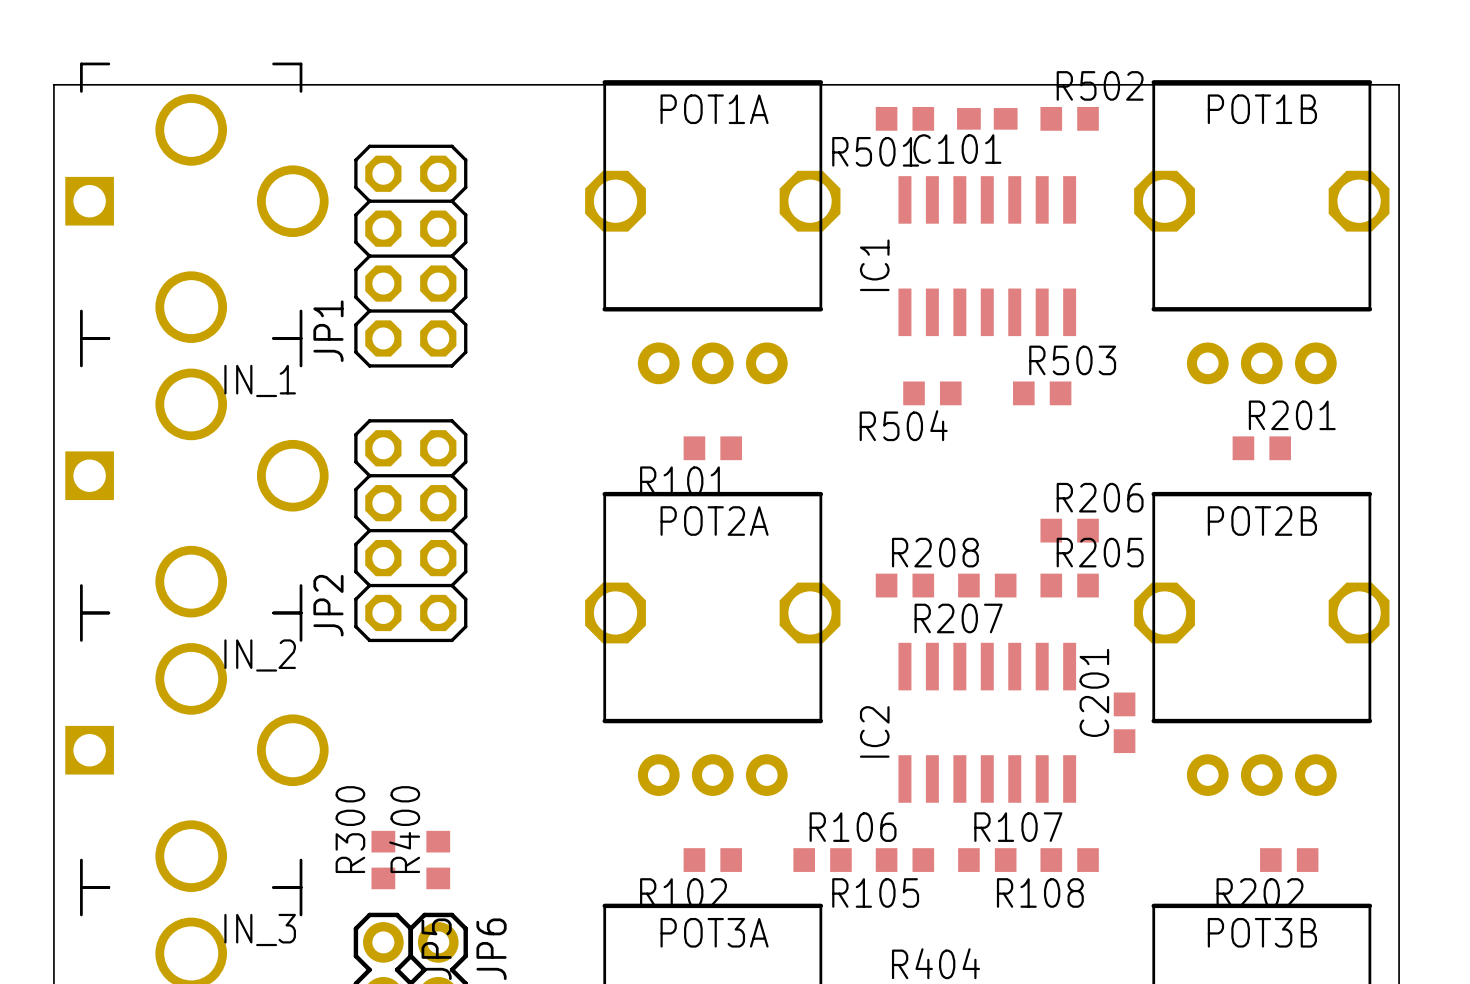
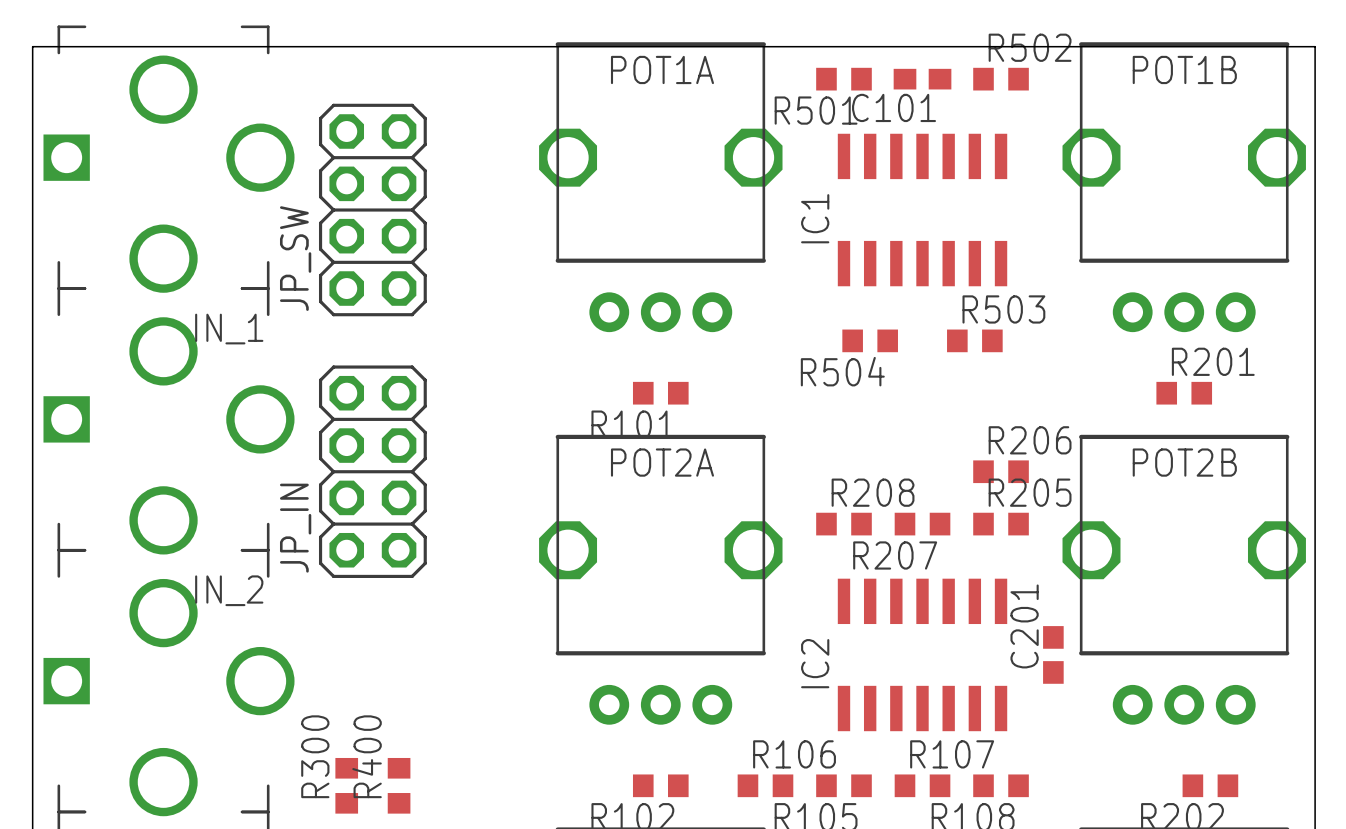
JP1 name: JP1 (328, 331) -> JP_SW (295, 258)
JP2 name: JP2 (328, 605) -> JP_IN (295, 528)

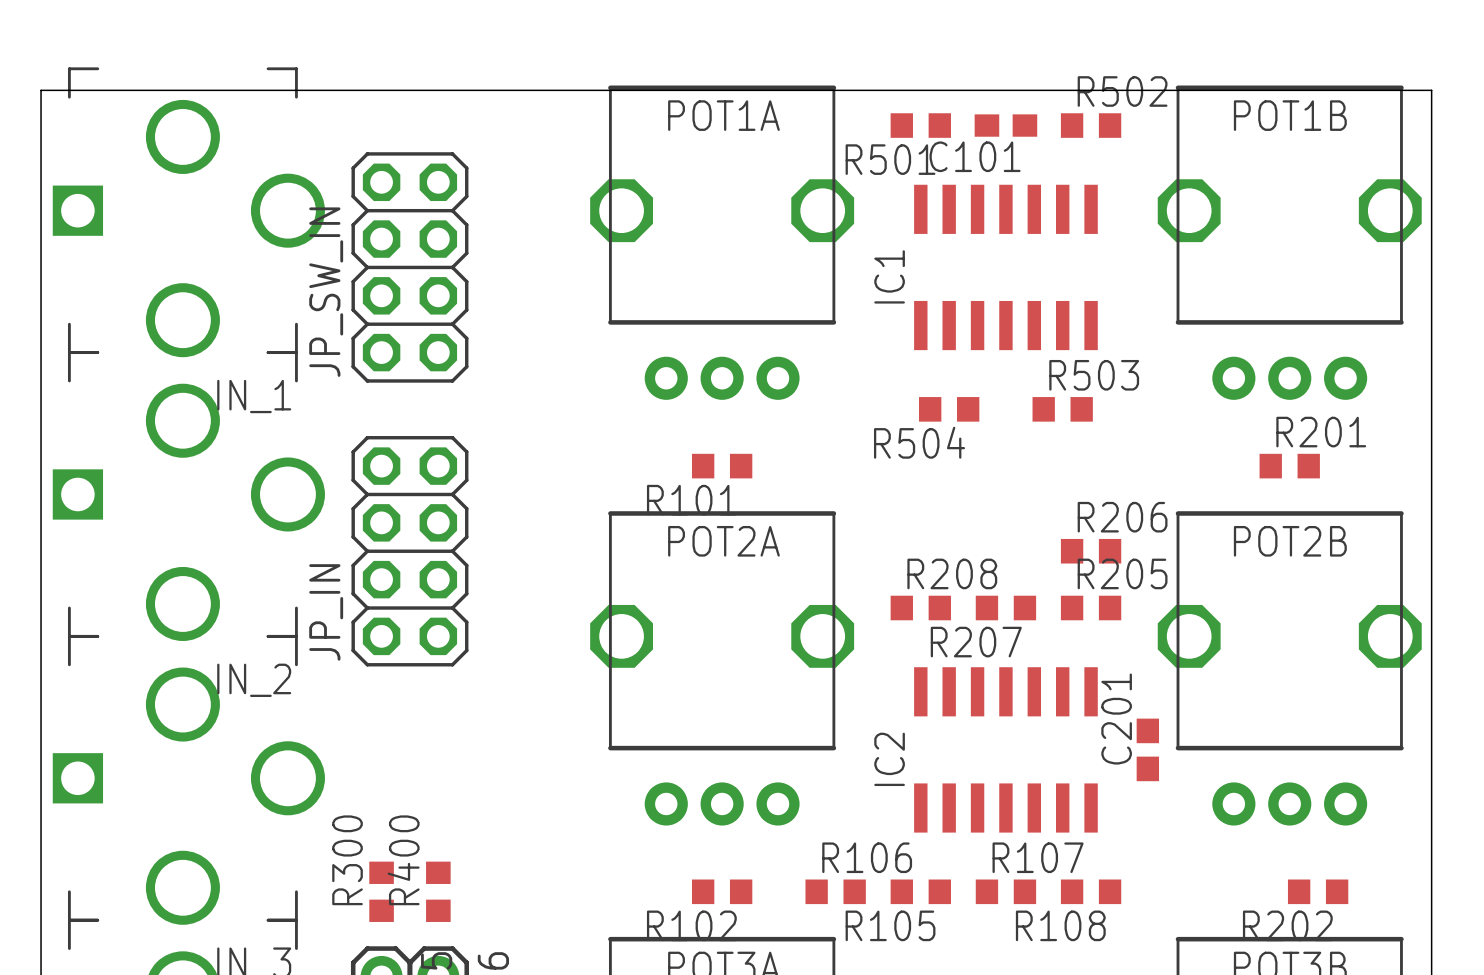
JP_SW name: JP_SW (295, 258) -> JP_SW_IN (326, 292)

